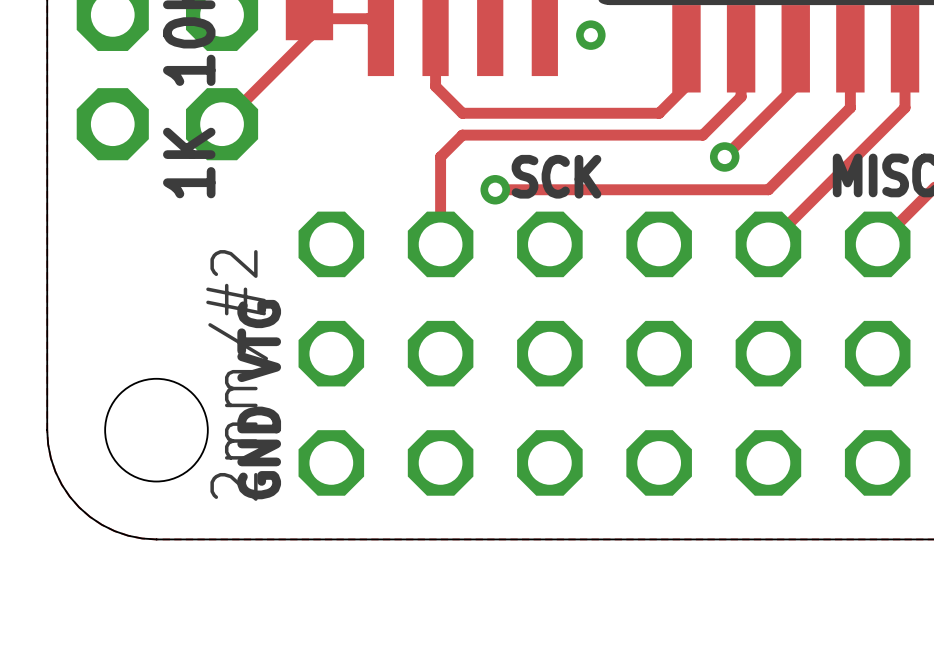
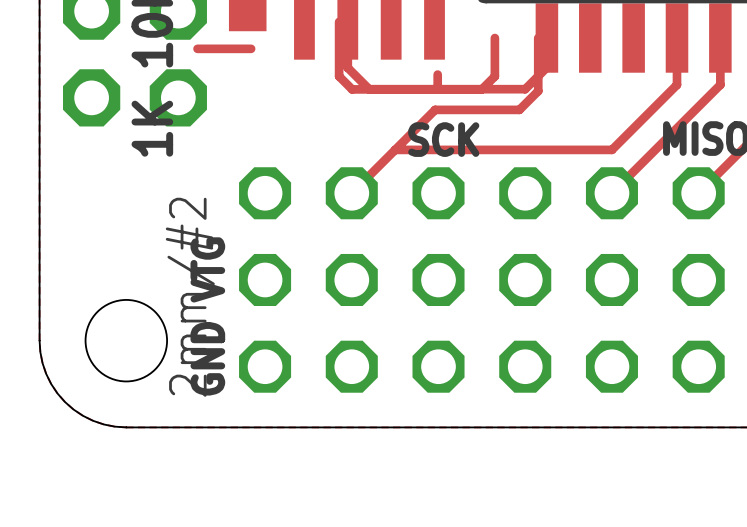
track: (380, 28) (368, 18) (309, 18) (309, 36) (222, 124) -> none
track: none -> (339, 21) (339, 76) (352, 89) (481, 89) (494, 76) (494, 38)
via: (590, 35) -> none
track: (741, 48) (741, 96) (702, 135) (462, 135) (440, 156) (440, 244) -> (538, 38) (538, 91) (519, 109) (435, 109) (351, 193)
track: (795, 48) (795, 85) (724, 156) -> none
track: none -> (197, 48) (251, 48)
track: none -> (437, 74) (437, 89)
via: (724, 156) -> none
via: (495, 189) -> none

